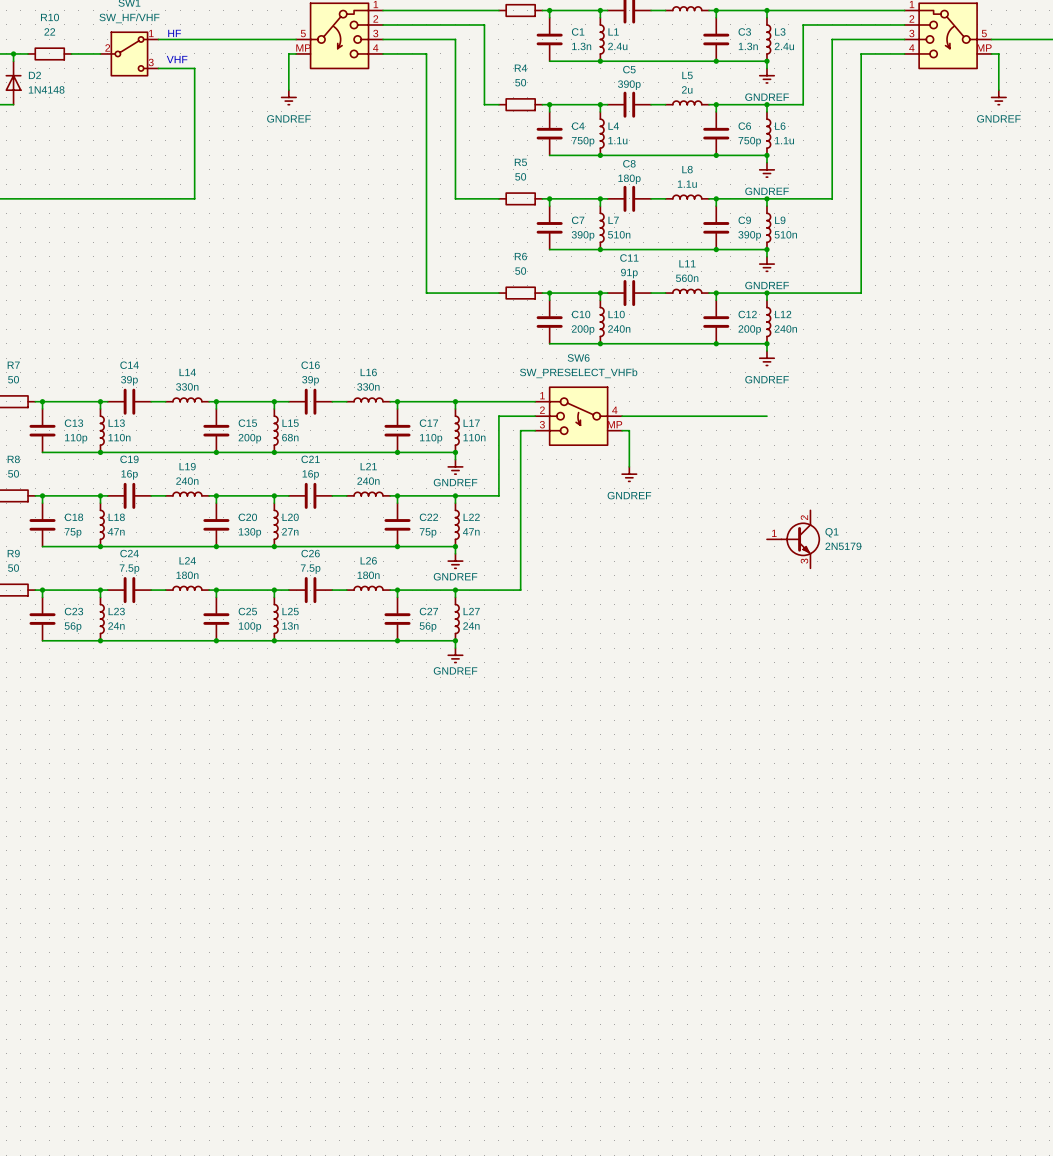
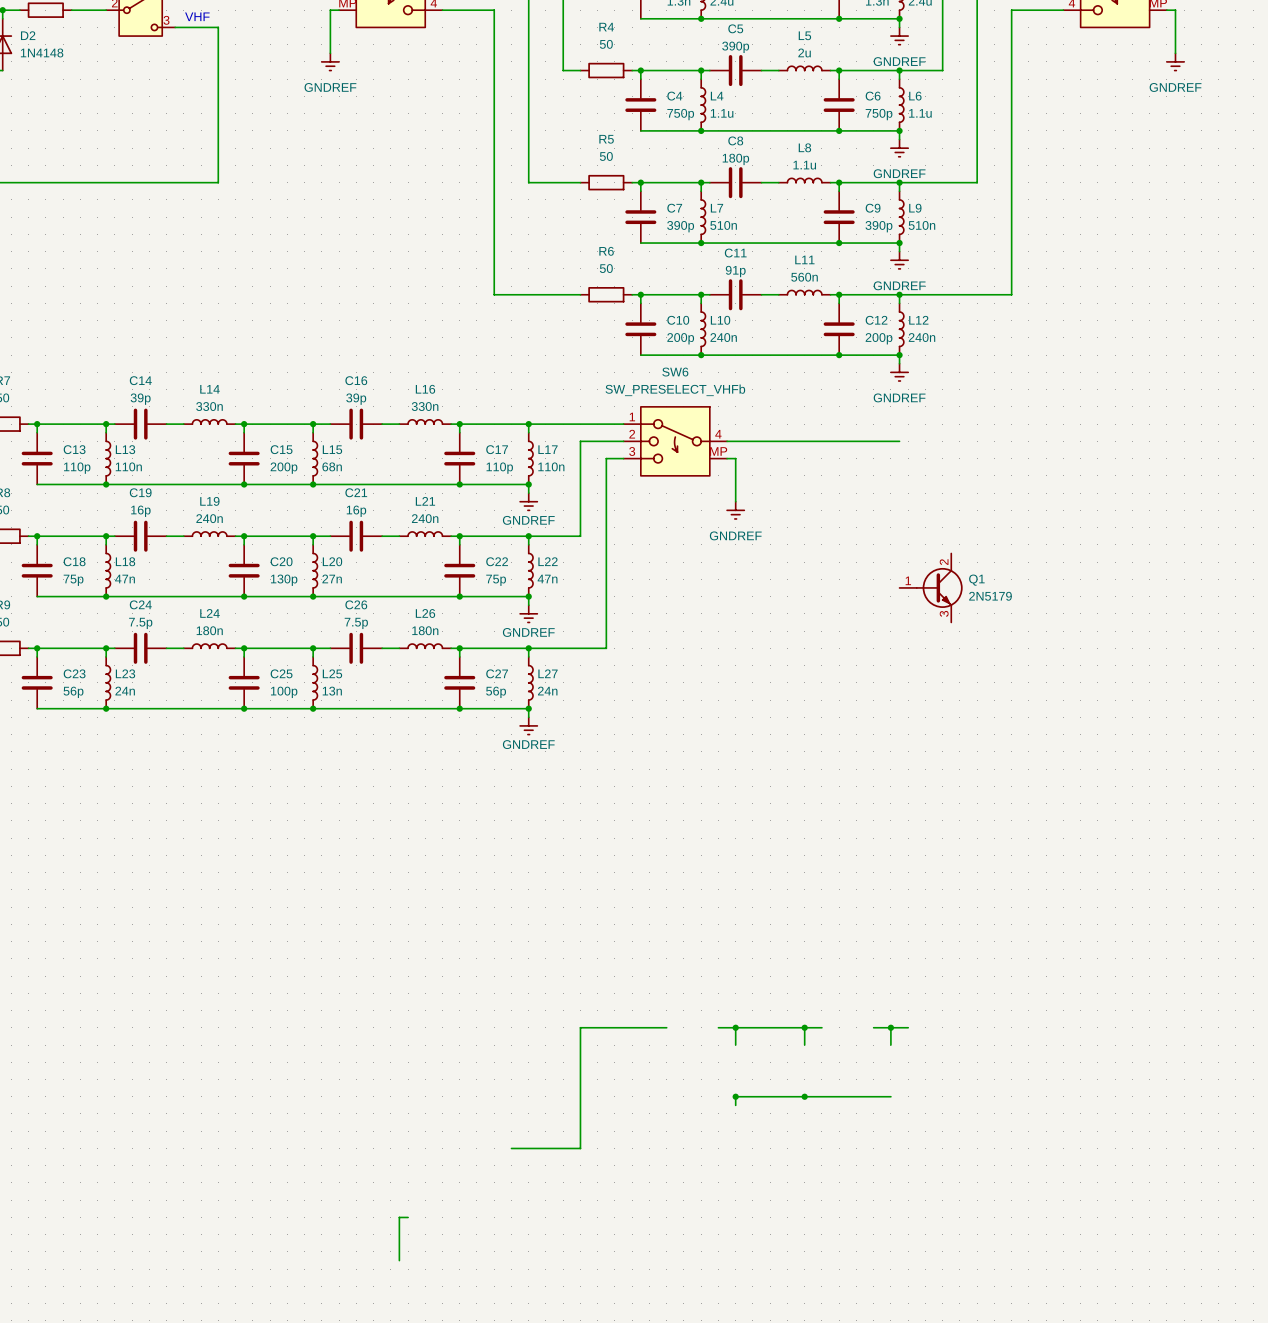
wire: none -> (666, 1027) (580, 1027) (580, 1148) (511, 1148)
wire: none -> (718, 1027) (821, 1027)
wire: none -> (735, 1027) (735, 1045)
junction: none -> (735, 1027)
wire: none -> (804, 1027) (804, 1045)
junction: none -> (804, 1027)
wire: none -> (873, 1027) (908, 1027)
wire: none -> (890, 1027) (890, 1045)
junction: none -> (890, 1027)
junction: none -> (735, 1096)
junction: none -> (804, 1096)
wire: none -> (890, 1096) (735, 1096) (735, 1105)
wire: none -> (408, 1217) (399, 1217) (399, 1260)

